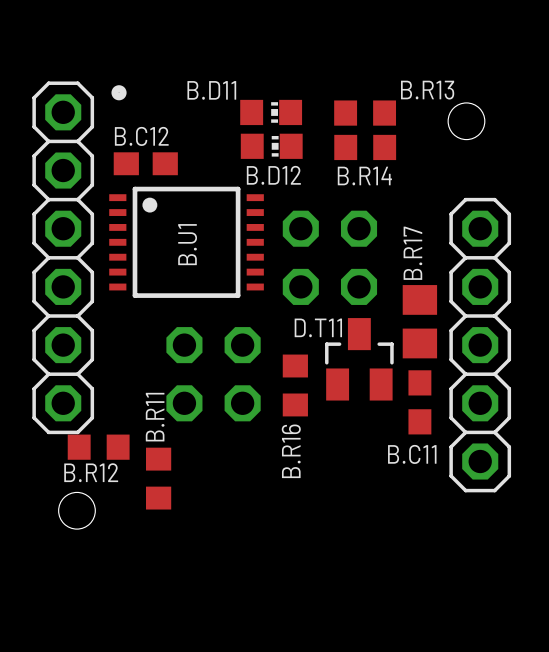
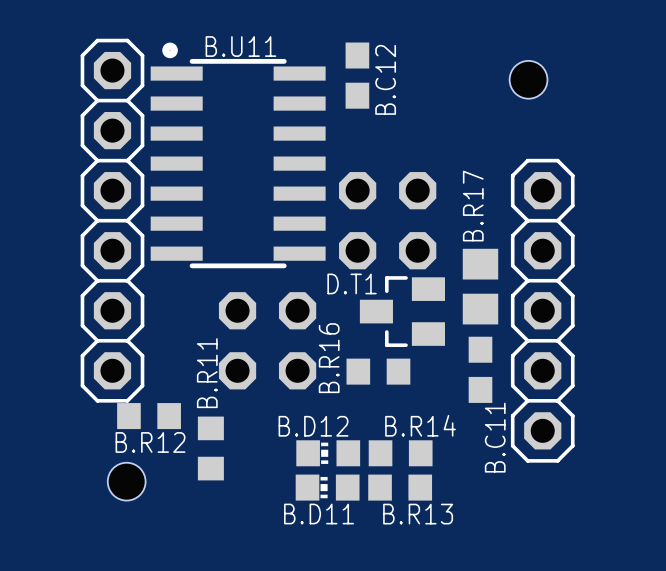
B.D11 name position: B.D11 (211, 90) -> B.D11 (319, 514)
B.R13 name position: B.R13 (427, 90) -> B.R13 (418, 514)
B.D11 rotation: 0° (271, 112) -> 180° (327, 487)
B.D11 position: (271, 112) -> (327, 487)
B.R13 position: (365, 113) -> (400, 487)
B.D12 rotation: 0° (271, 146) -> 180° (328, 453)
B.D12 position: (271, 146) -> (328, 453)
B.R14 position: (365, 147) -> (400, 453)
B.C12 rotation: 0° (145, 163) -> 90° clockwise (357, 75)
B.C12 position: (145, 163) -> (357, 75)
B.R14 name position: B.R14 (364, 176) -> B.R14 (420, 425)
B.U11: none -> (238, 163)
B.U1: (186, 242) -> none
D.T1: none -> (402, 311)
D.T11: (359, 359) -> none
B.R16 rotation: 0° (295, 385) -> 90° clockwise (378, 371)
B.C11 name rotation: 0° (412, 454) -> 90° counterclockwise (495, 437)

